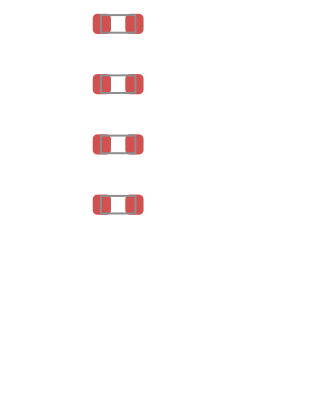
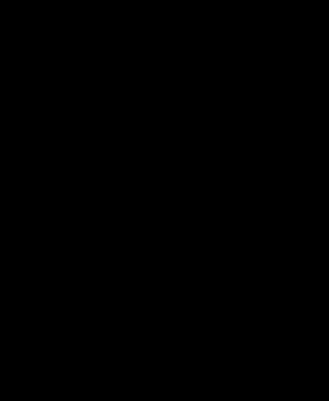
part: (118, 23) -> none
part: (118, 84) -> none
part: (118, 144) -> none
part: (118, 204) -> none

